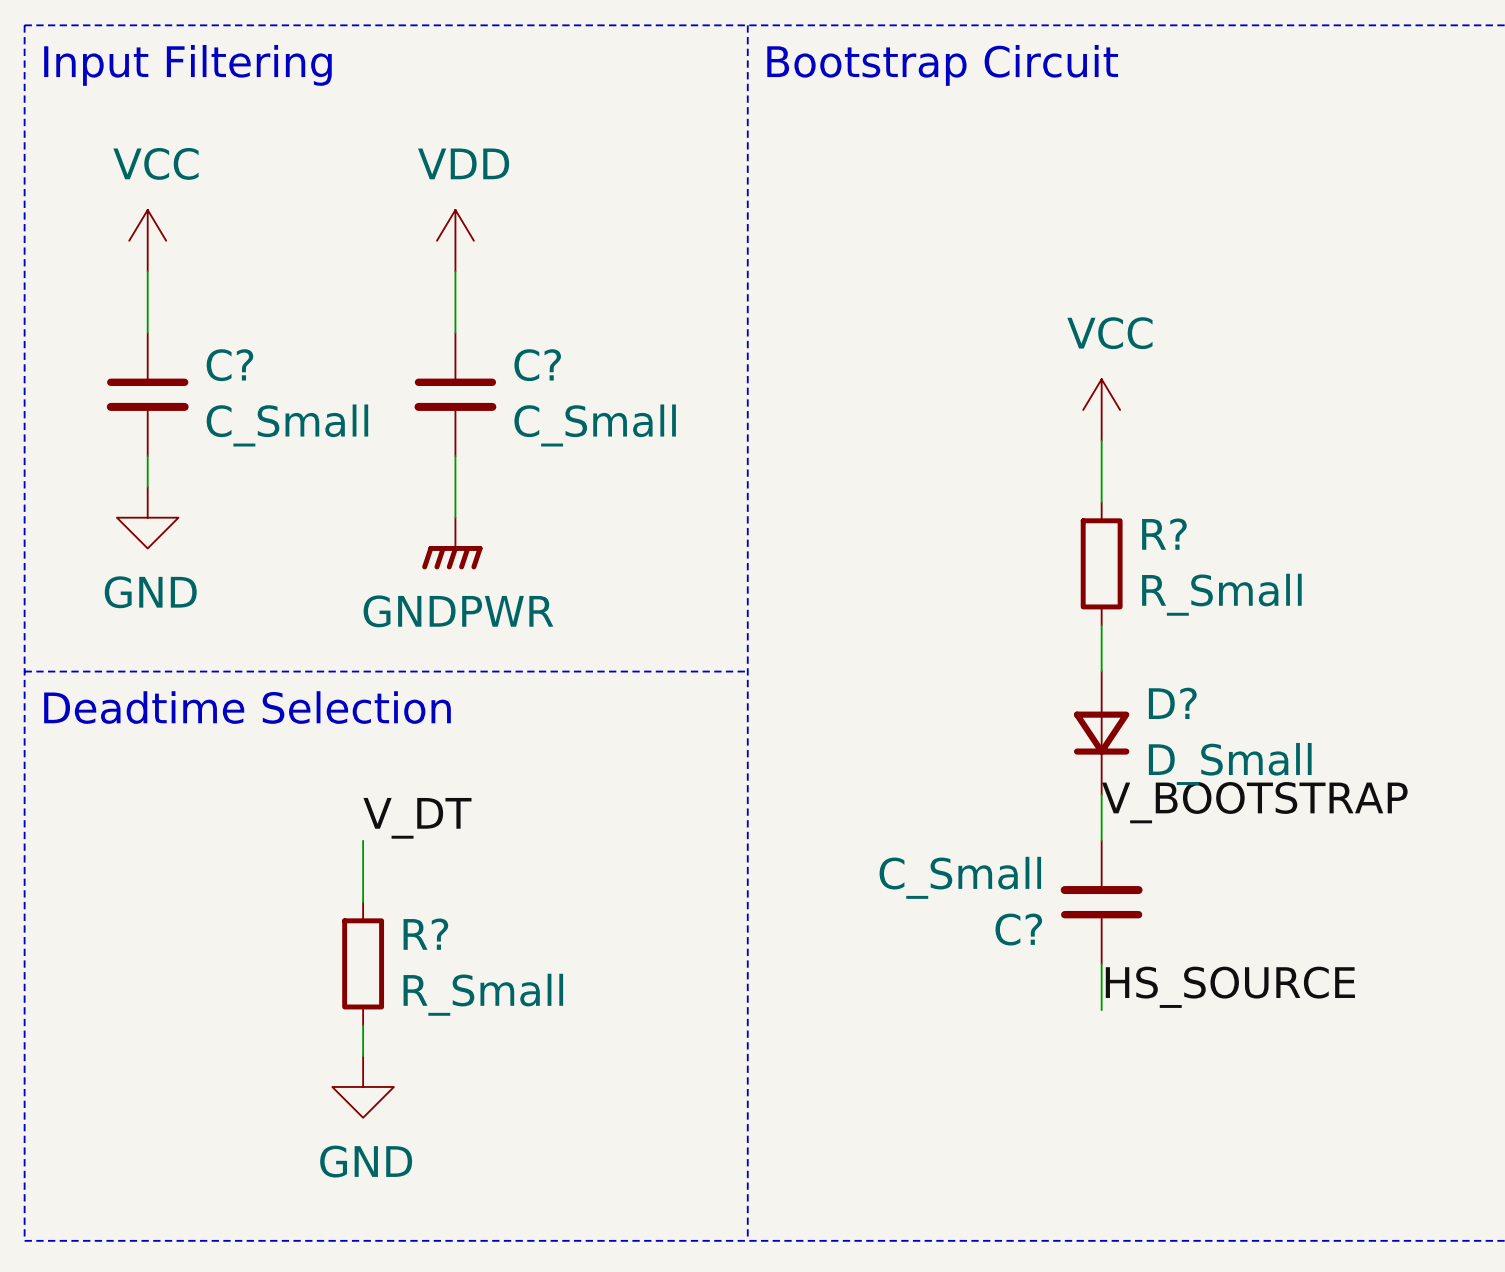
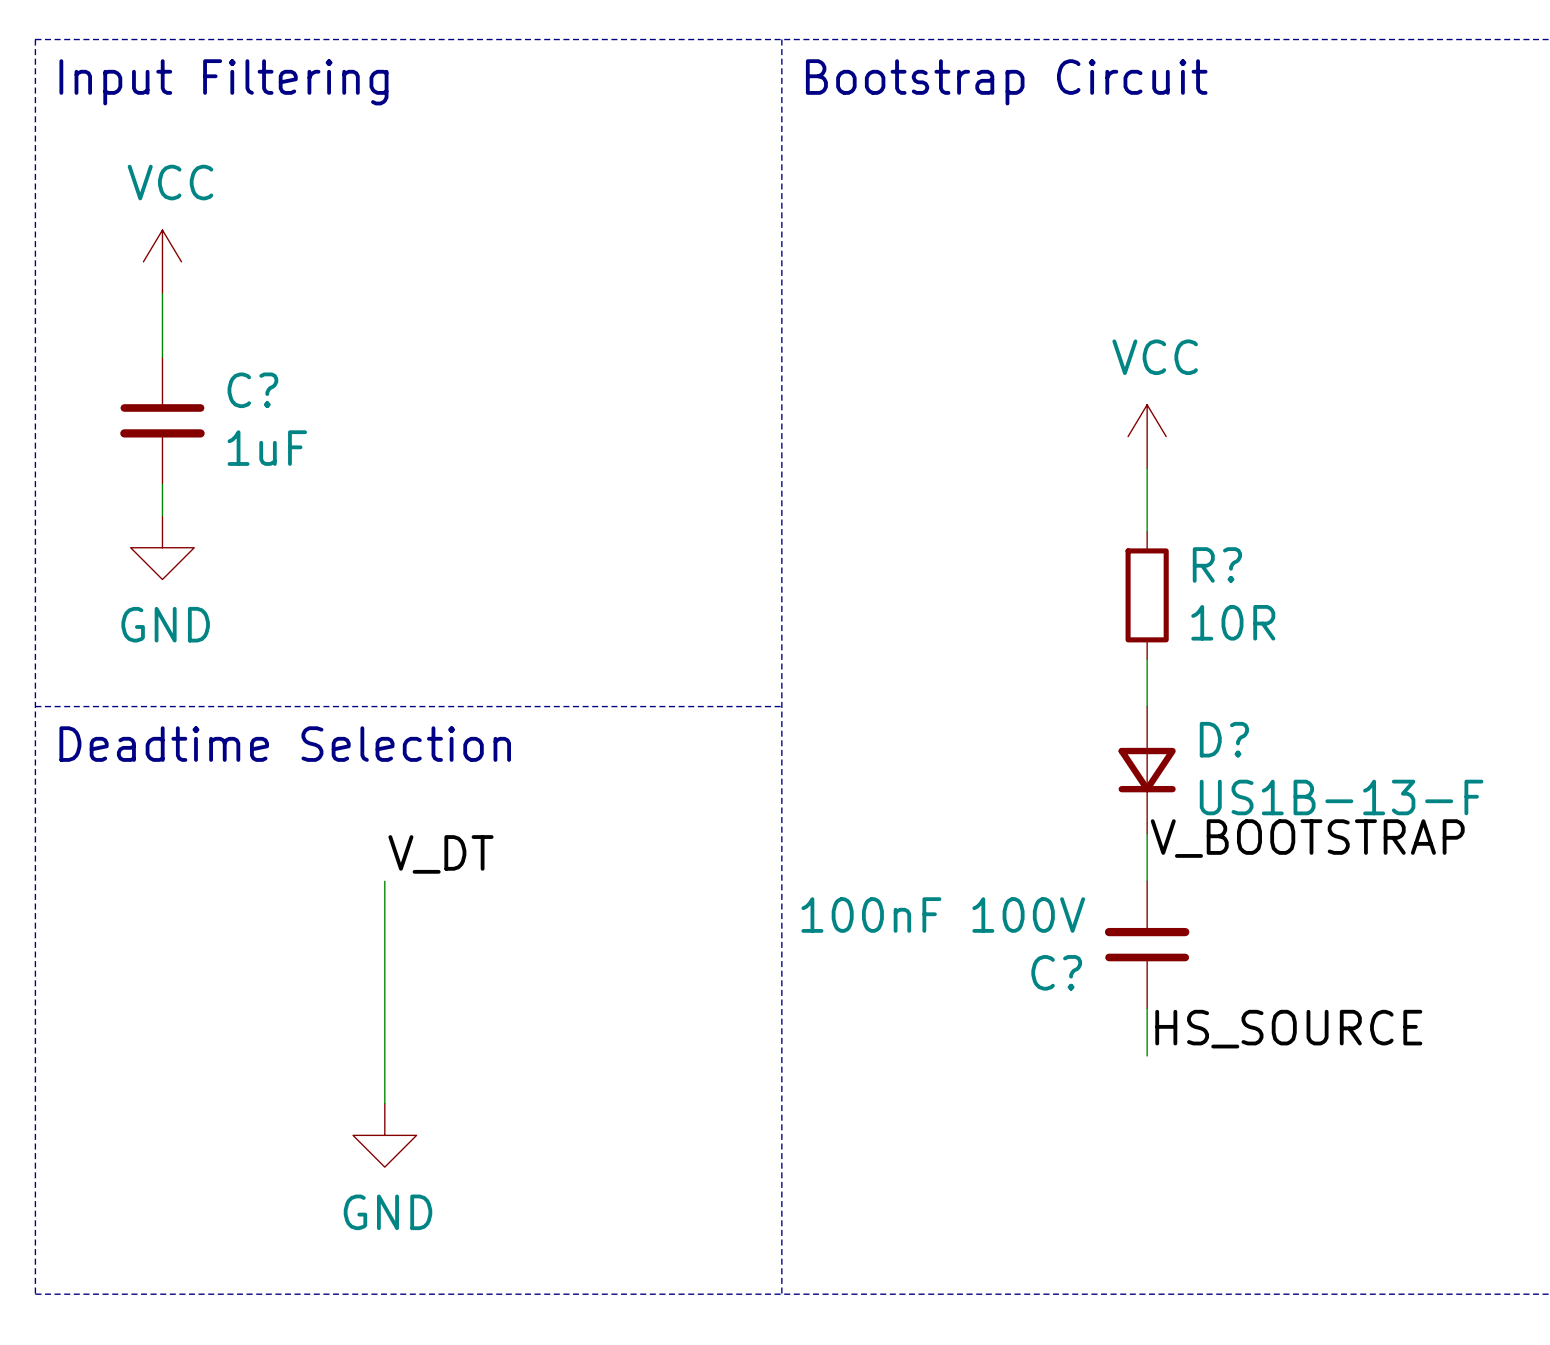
power symbol: VDD (455, 240) -> none
wire: (455, 271) (455, 333) -> none
C?: C_Small (455, 394) -> none
C? value: C_Small (287, 425) -> 1uF (267, 448)
wire: (455, 456) (455, 517) -> none
power symbol: GNDPWR (452, 543) -> none
R? value: R_Small (1221, 594) -> 10R (1233, 622)
D? value: D_Small (1230, 763) -> US1B-13-F (1341, 797)
C? value: C_Small (960, 877) -> 100nF 100V (943, 915)
wire: none -> (384, 944) (384, 1071)
R?: R_Small (363, 963) -> none

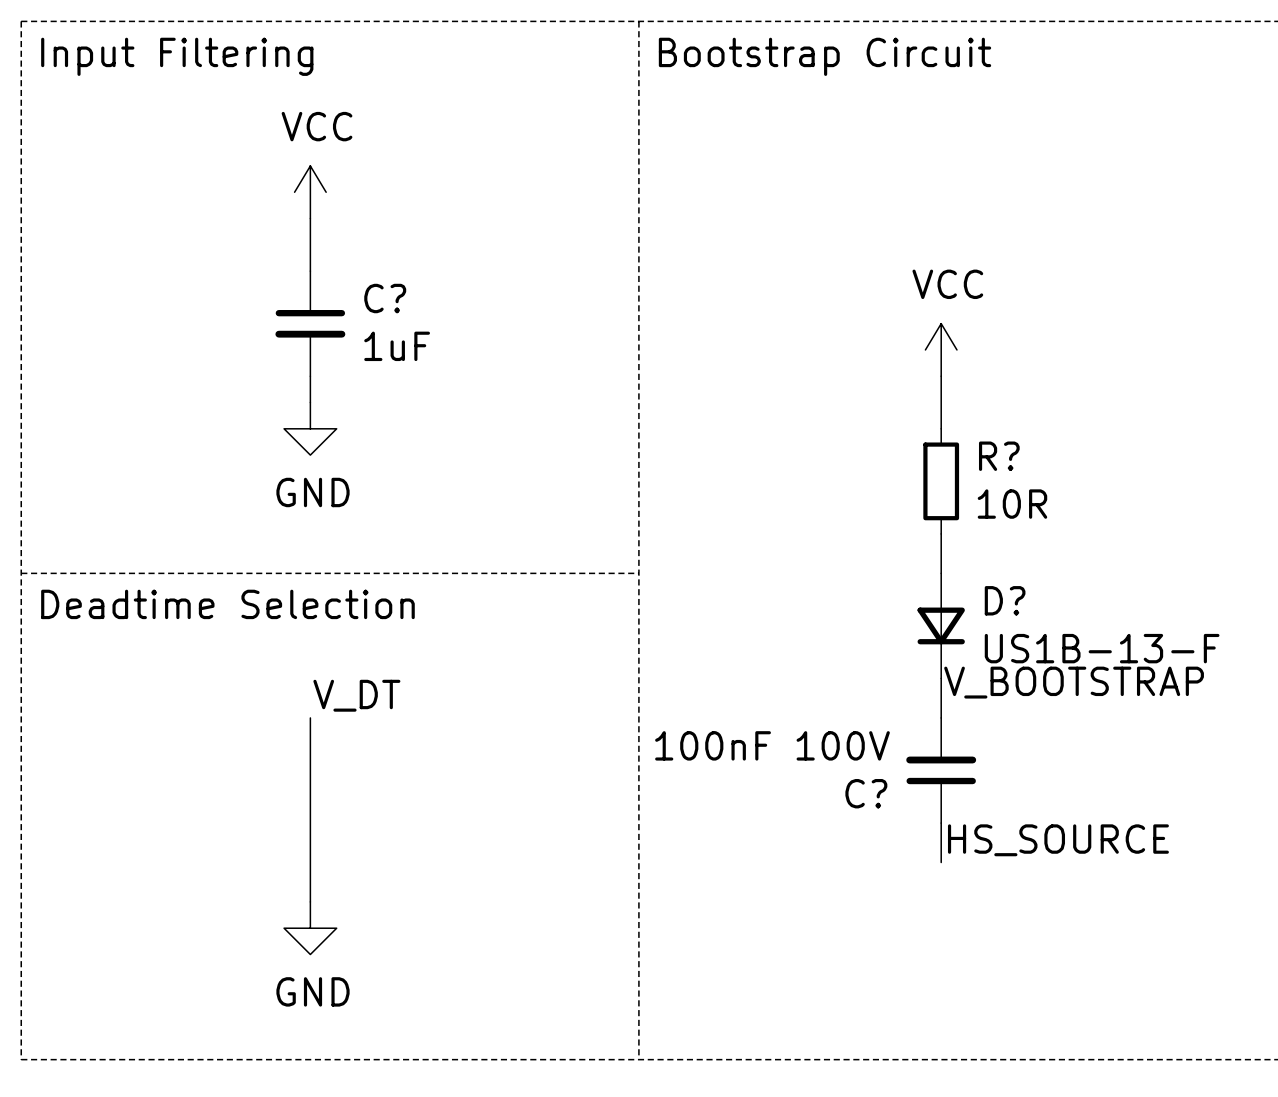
power symbol position: VCC (162, 261) -> VCC (310, 192)
wire: (162, 293) (162, 357) -> (310, 218) (310, 271)
C? position: (162, 420) -> (310, 323)
wire: (162, 484) (162, 515) -> (310, 376) (310, 402)
power symbol position: GND (162, 547) -> GND (310, 428)

